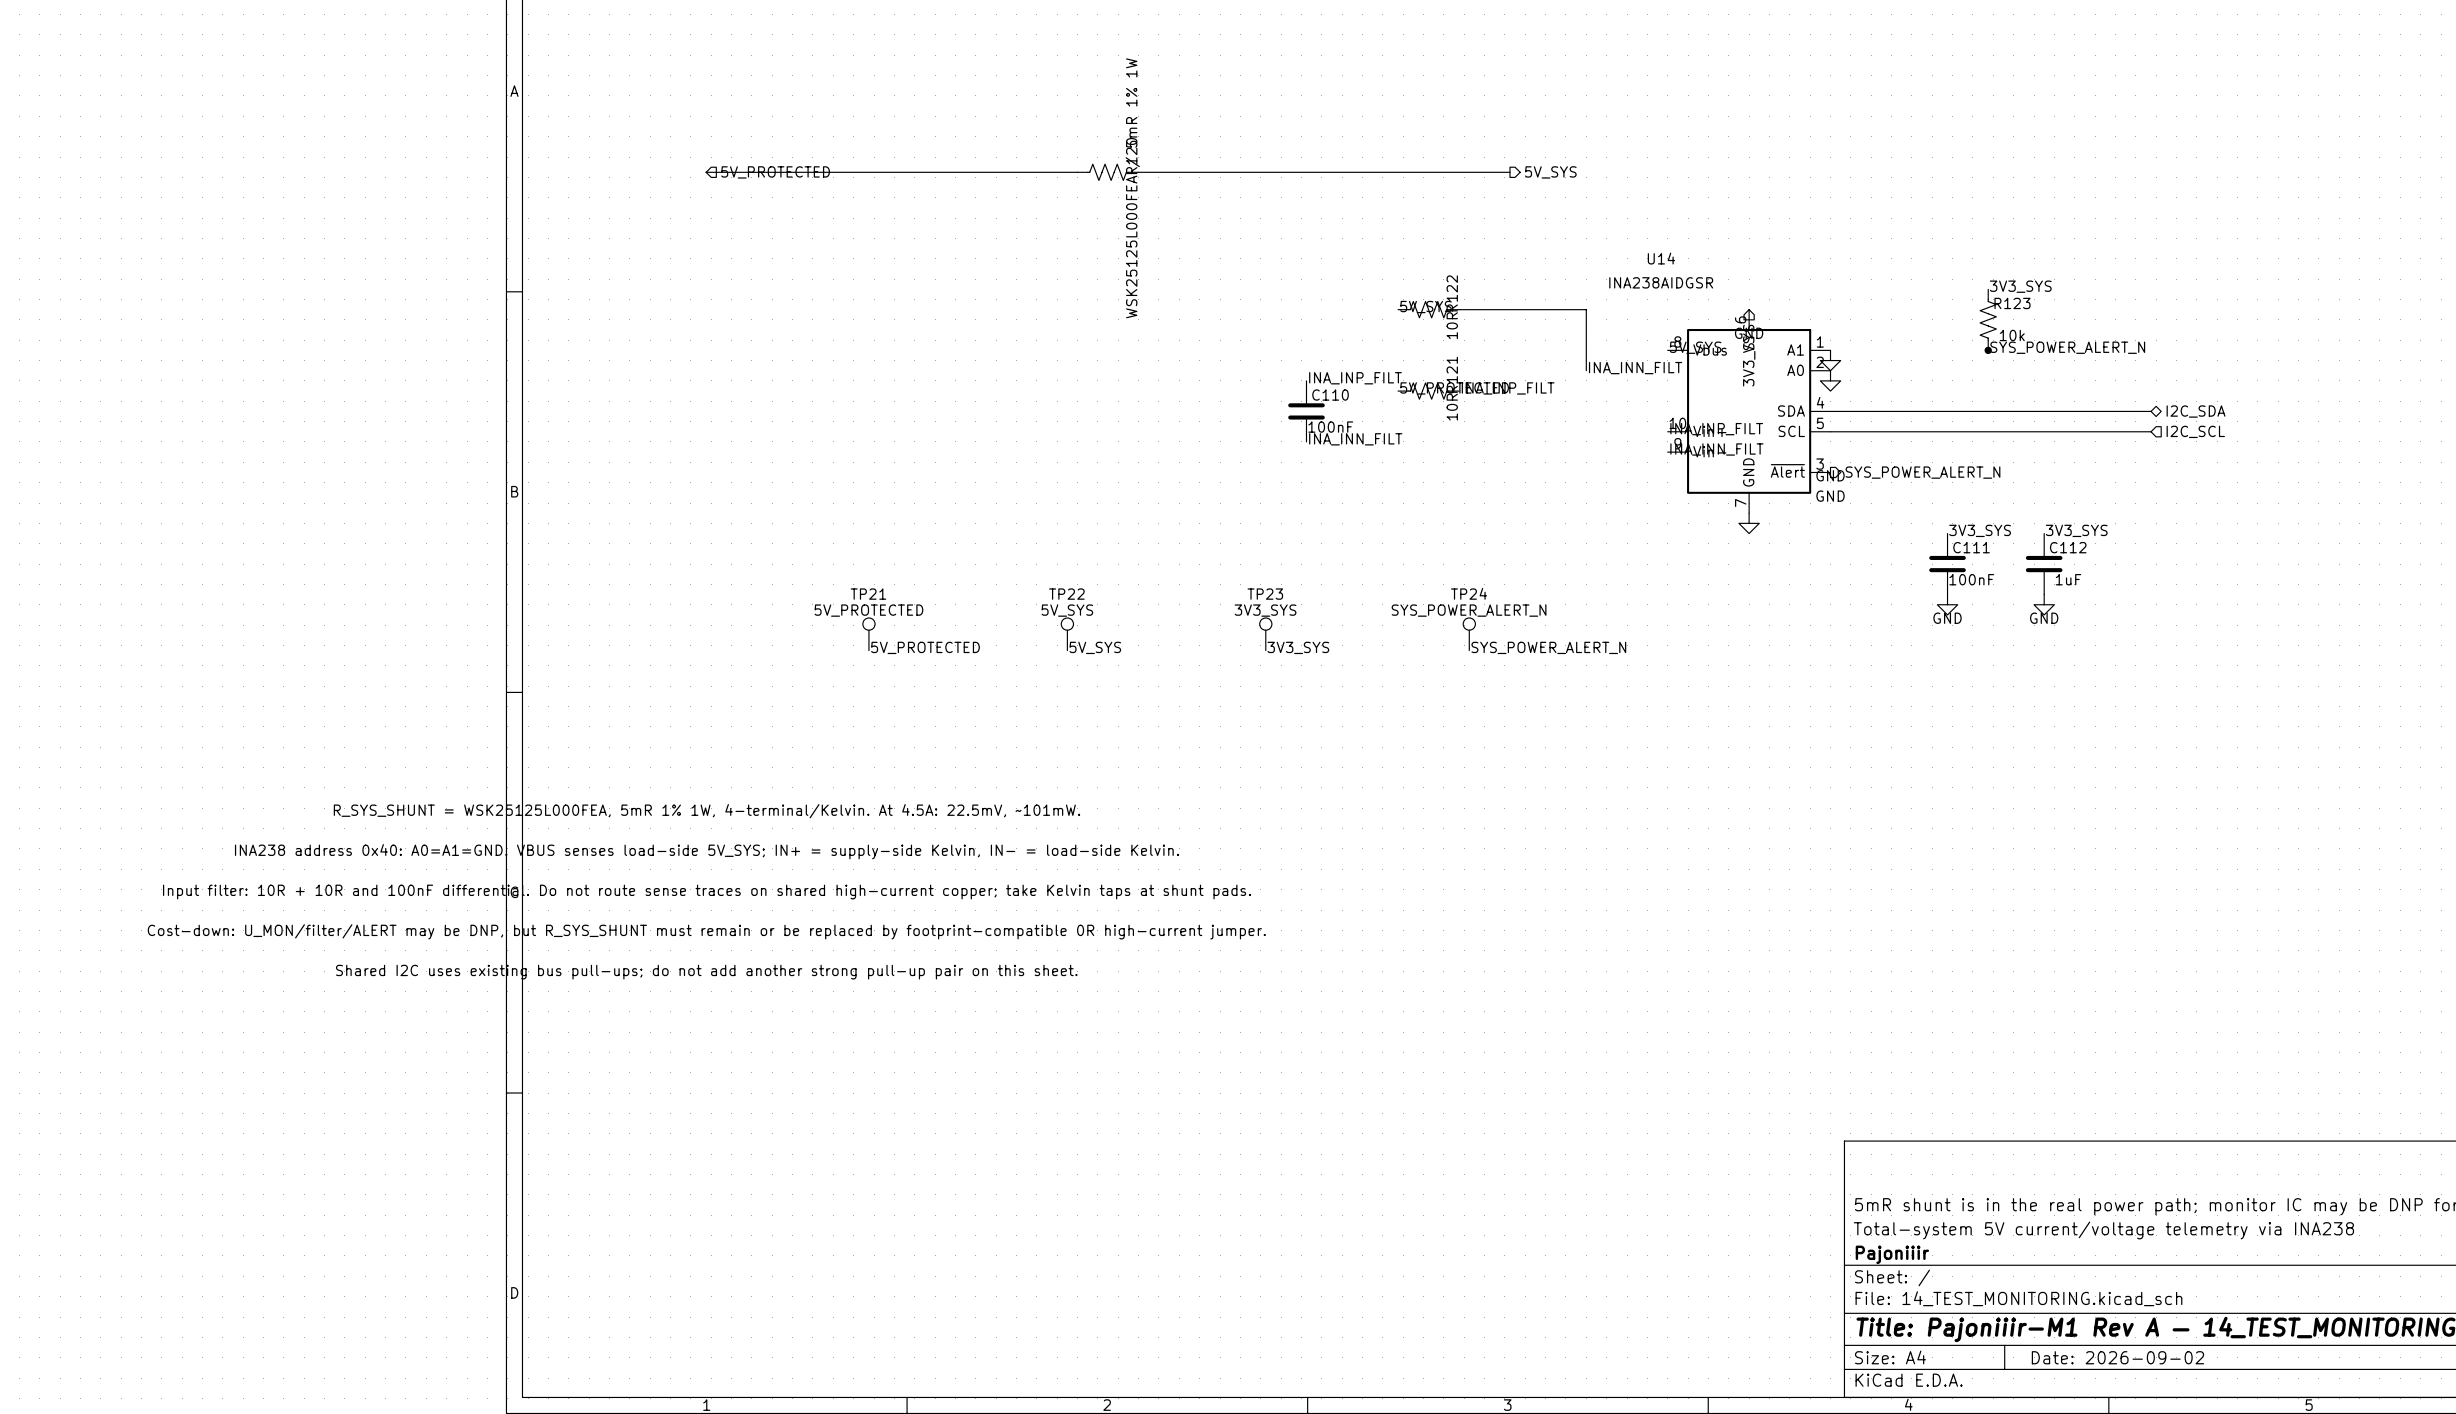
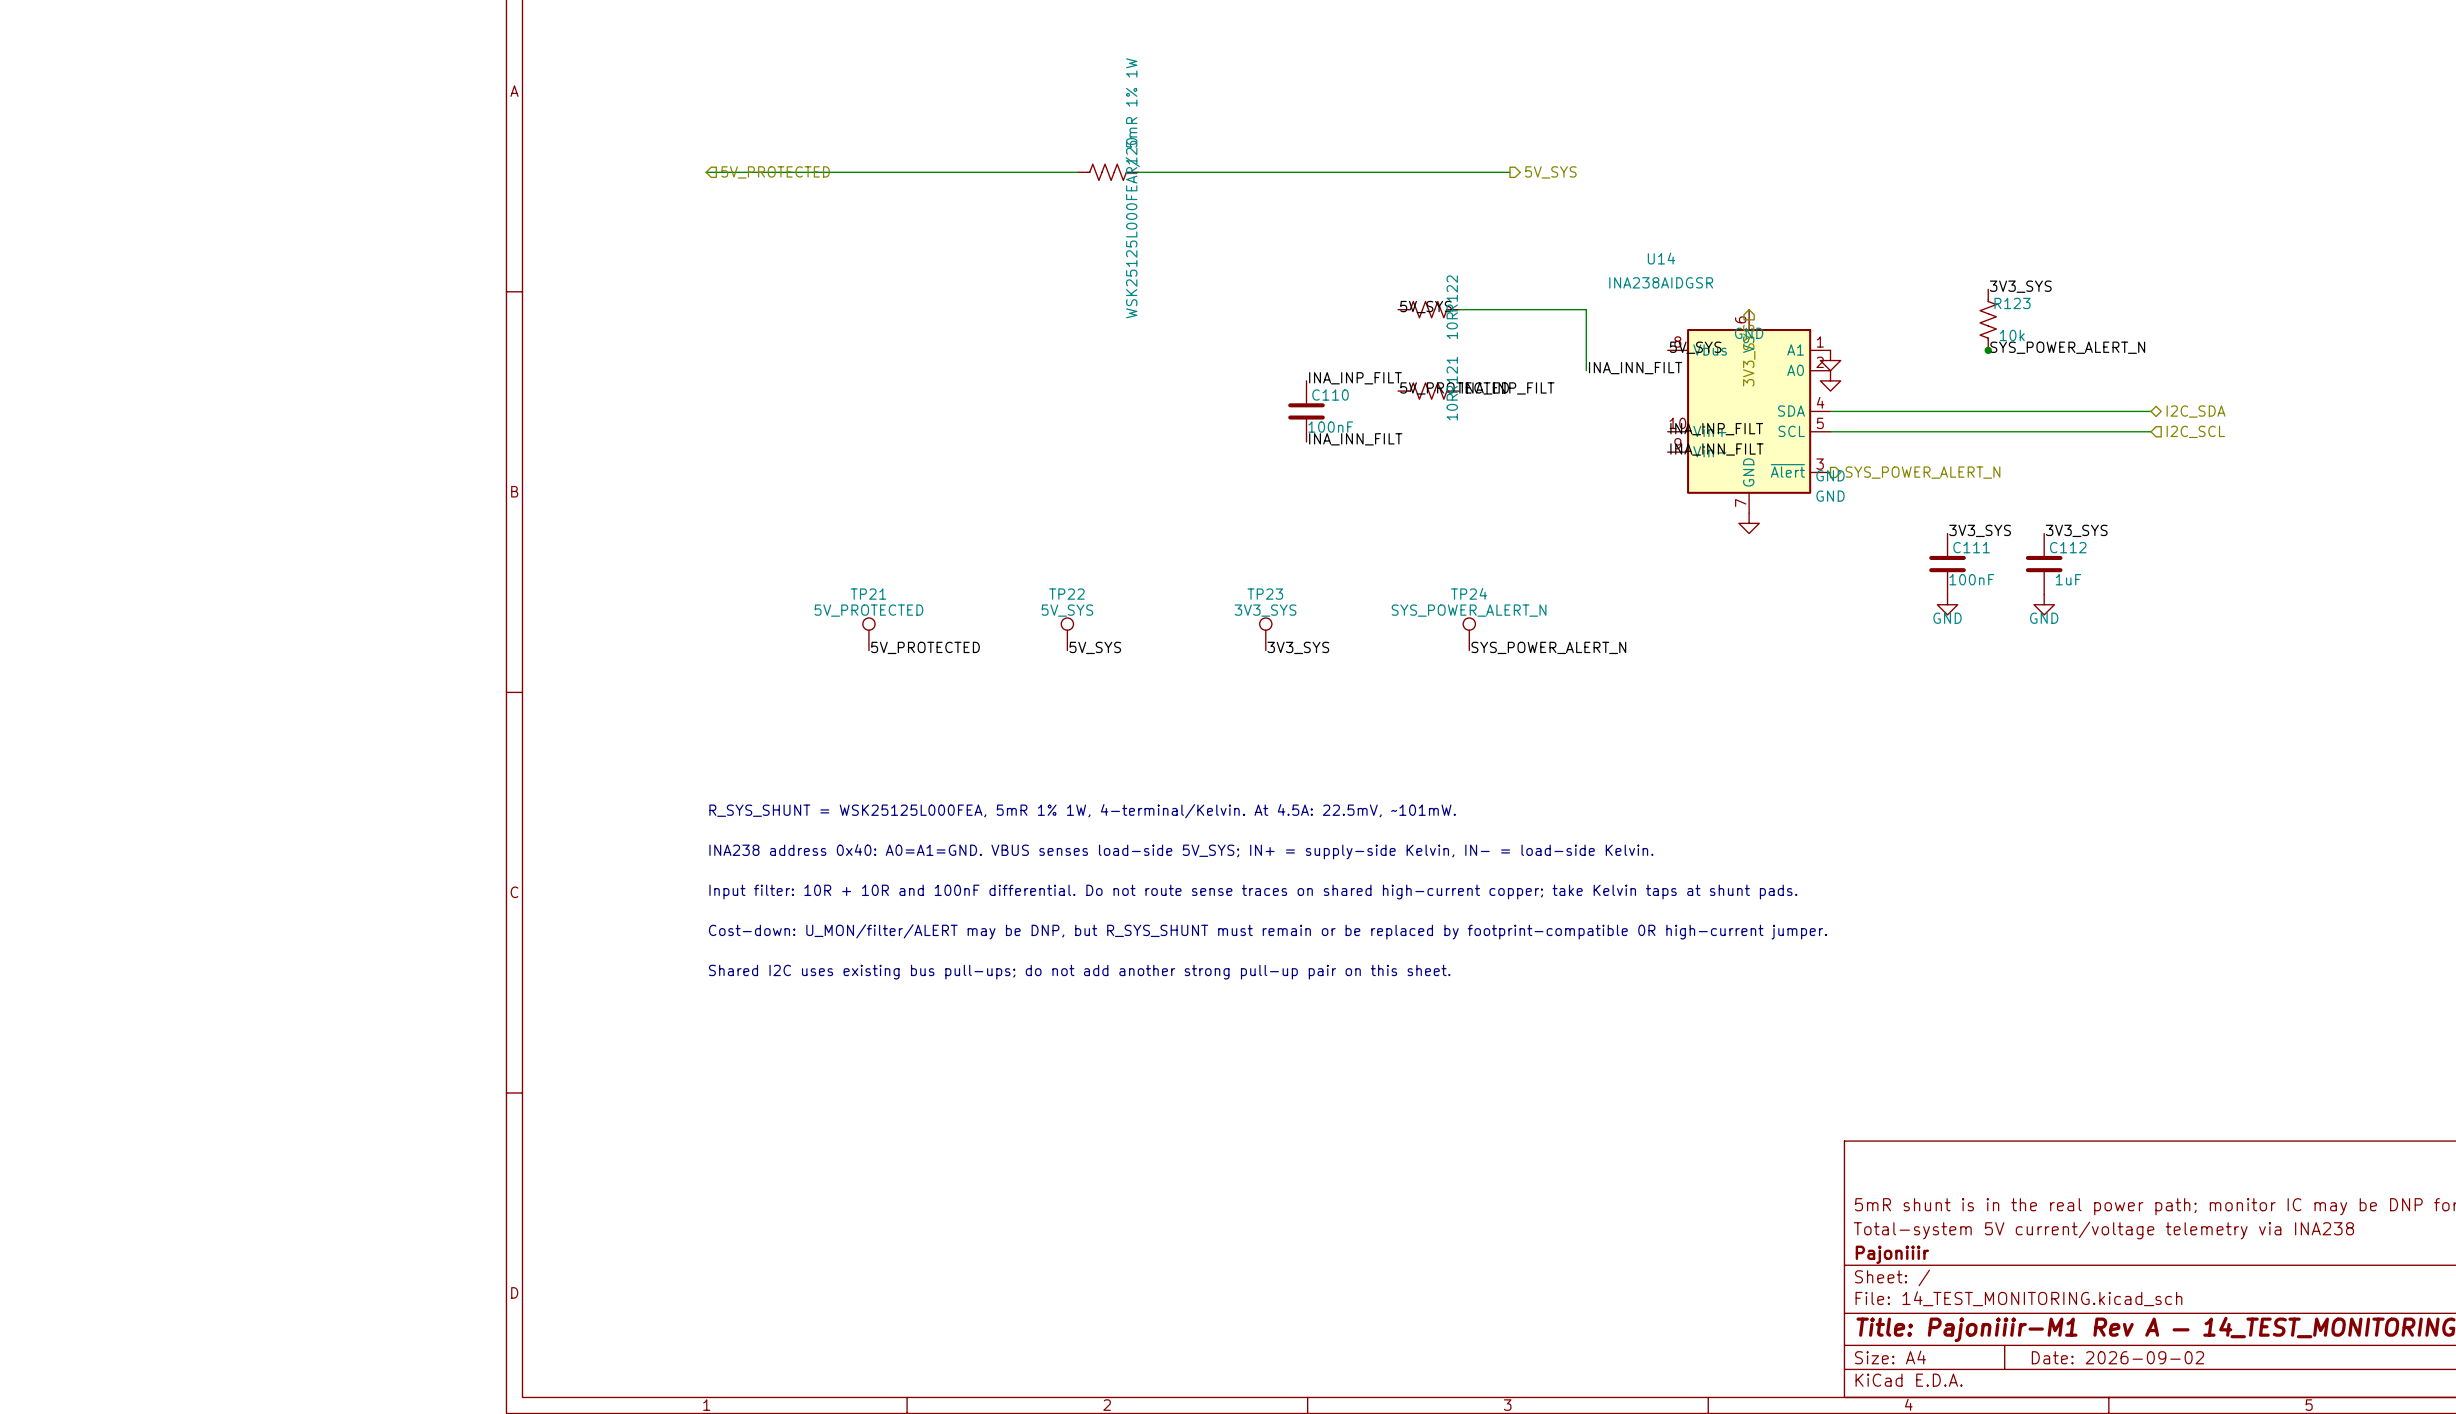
text position: R_SYS_SHUNT = WSK25125L000FEA, 5mR 1% 1W, 4-terminal/Kelvin. At 4.5A: 22.5mV, ~101mW. (707, 811) -> R_SYS_SHUNT = WSK25125L000FEA, 5mR 1% 1W, 4-terminal/Kelvin. At 4.5A: 22.5mV, ~101mW. (1082, 811)
text position: INA238 address 0x40: A0=A1=GND. VBUS senses load-side 5V_SYS; IN+ = supply-side Kelvin, IN- = load-side Kelvin. (707, 851) -> INA238 address 0x40: A0=A1=GND. VBUS senses load-side 5V_SYS; IN+ = supply-side Kelvin, IN- = load-side Kelvin. (1181, 851)
text position: Input filter: 10R + 10R and 100nF differential. Do not route sense traces on shared high-current copper; take Kelvin taps at shunt pads. (707, 892) -> Input filter: 10R + 10R and 100nF differential. Do not route sense traces on shared high-current copper; take Kelvin taps at shunt pads. (1253, 892)
text position: Cost-down: U_MON/filter/ALERT may be DNP, but R_SYS_SHUNT must remain or be replaced by footprint-compatible 0R high-current jumper. (706, 931) -> Cost-down: U_MON/filter/ALERT may be DNP, but R_SYS_SHUNT must remain or be replaced by footprint-compatible 0R high-current jumper. (1267, 931)
text position: Shared I2C uses existing bus pull-ups; do not add another strong pull-up pair on this sheet. (706, 972) -> Shared I2C uses existing bus pull-ups; do not add another strong pull-up pair on this sheet. (1079, 972)

